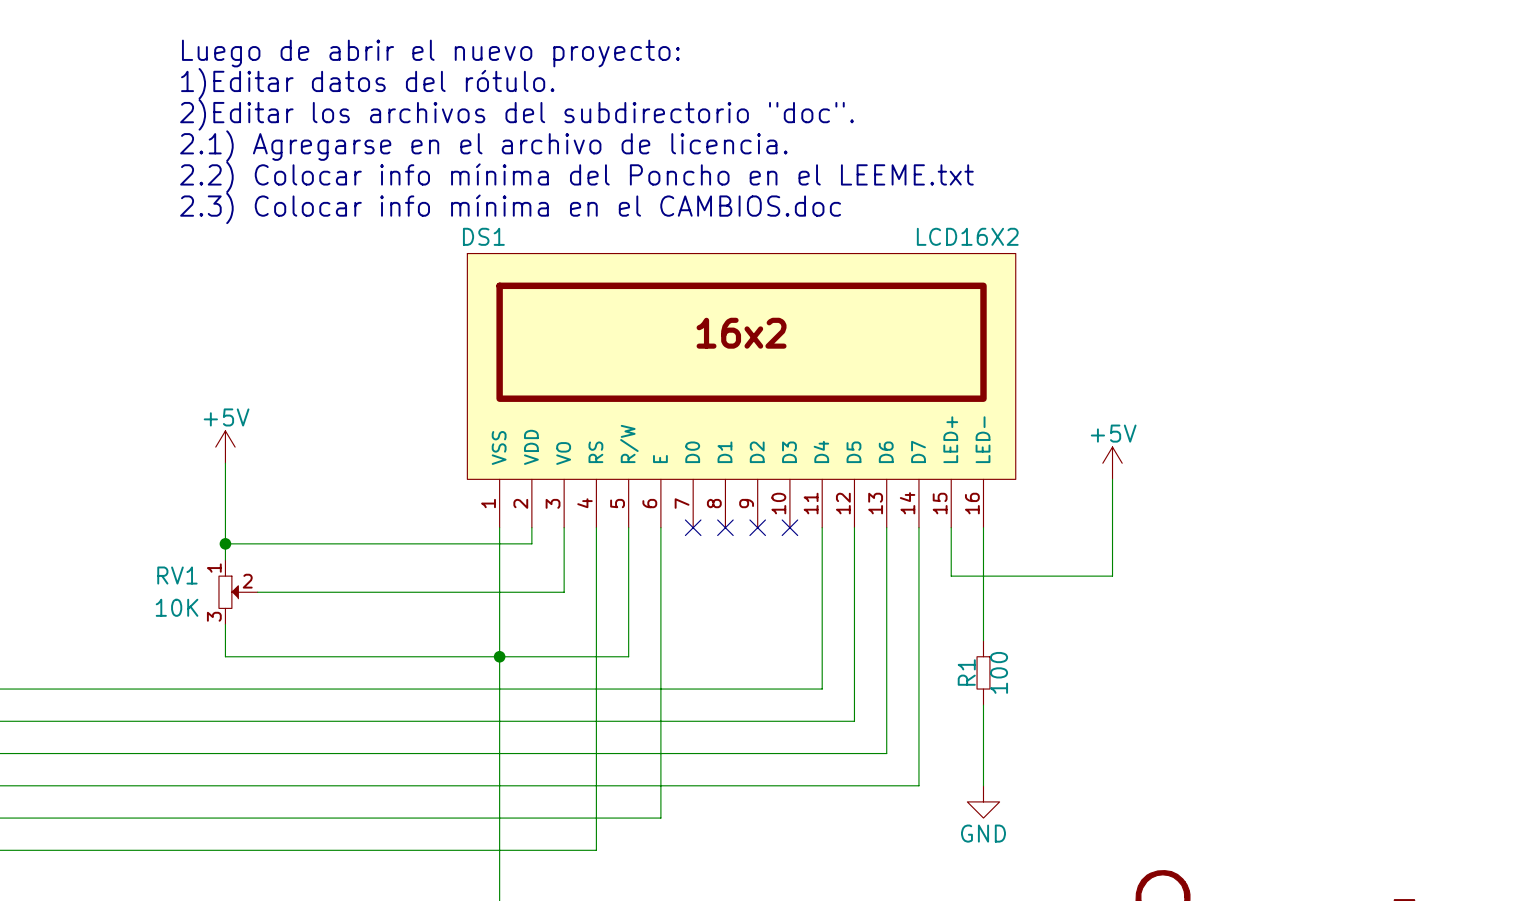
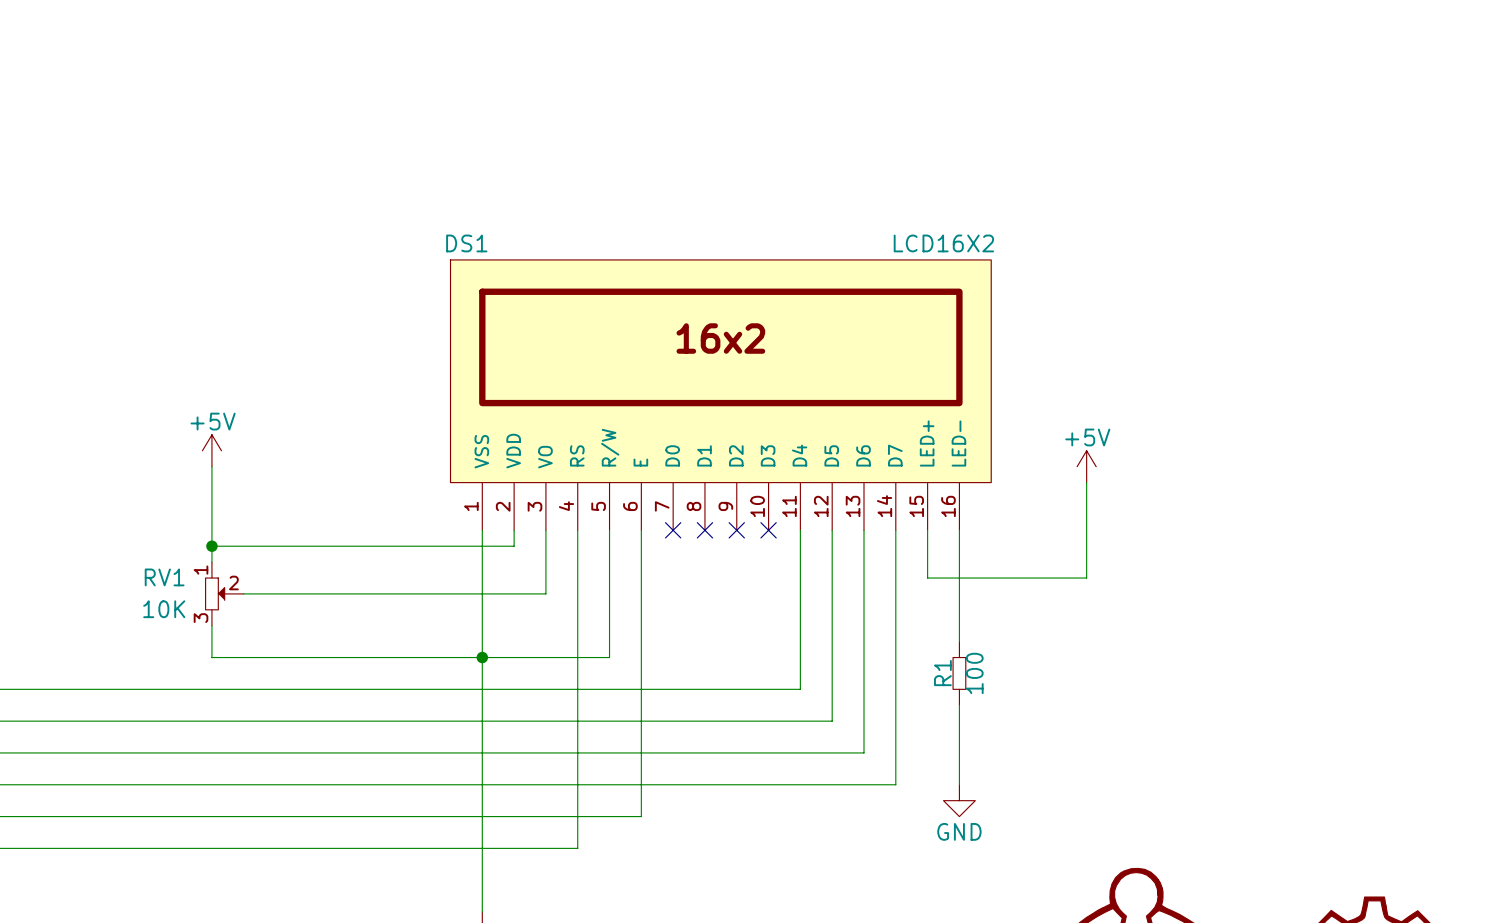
text: Luego de abrir el nuevo proyecto: (430, 53) -> none
text: 1)Editar datos del rótulo. (367, 83) -> none
text: 2)Editar los archivos del subdirectorio "doc". (517, 114) -> none
text: 2.1) Agregarse en el archivo de licencia. (483, 146) -> none
text: 2.2) Colocar info mínima del Poncho en el LEEME.txt (576, 177) -> none
text: 2.3) Colocar info mínima en el CAMBIOS.doc (510, 208) -> none

